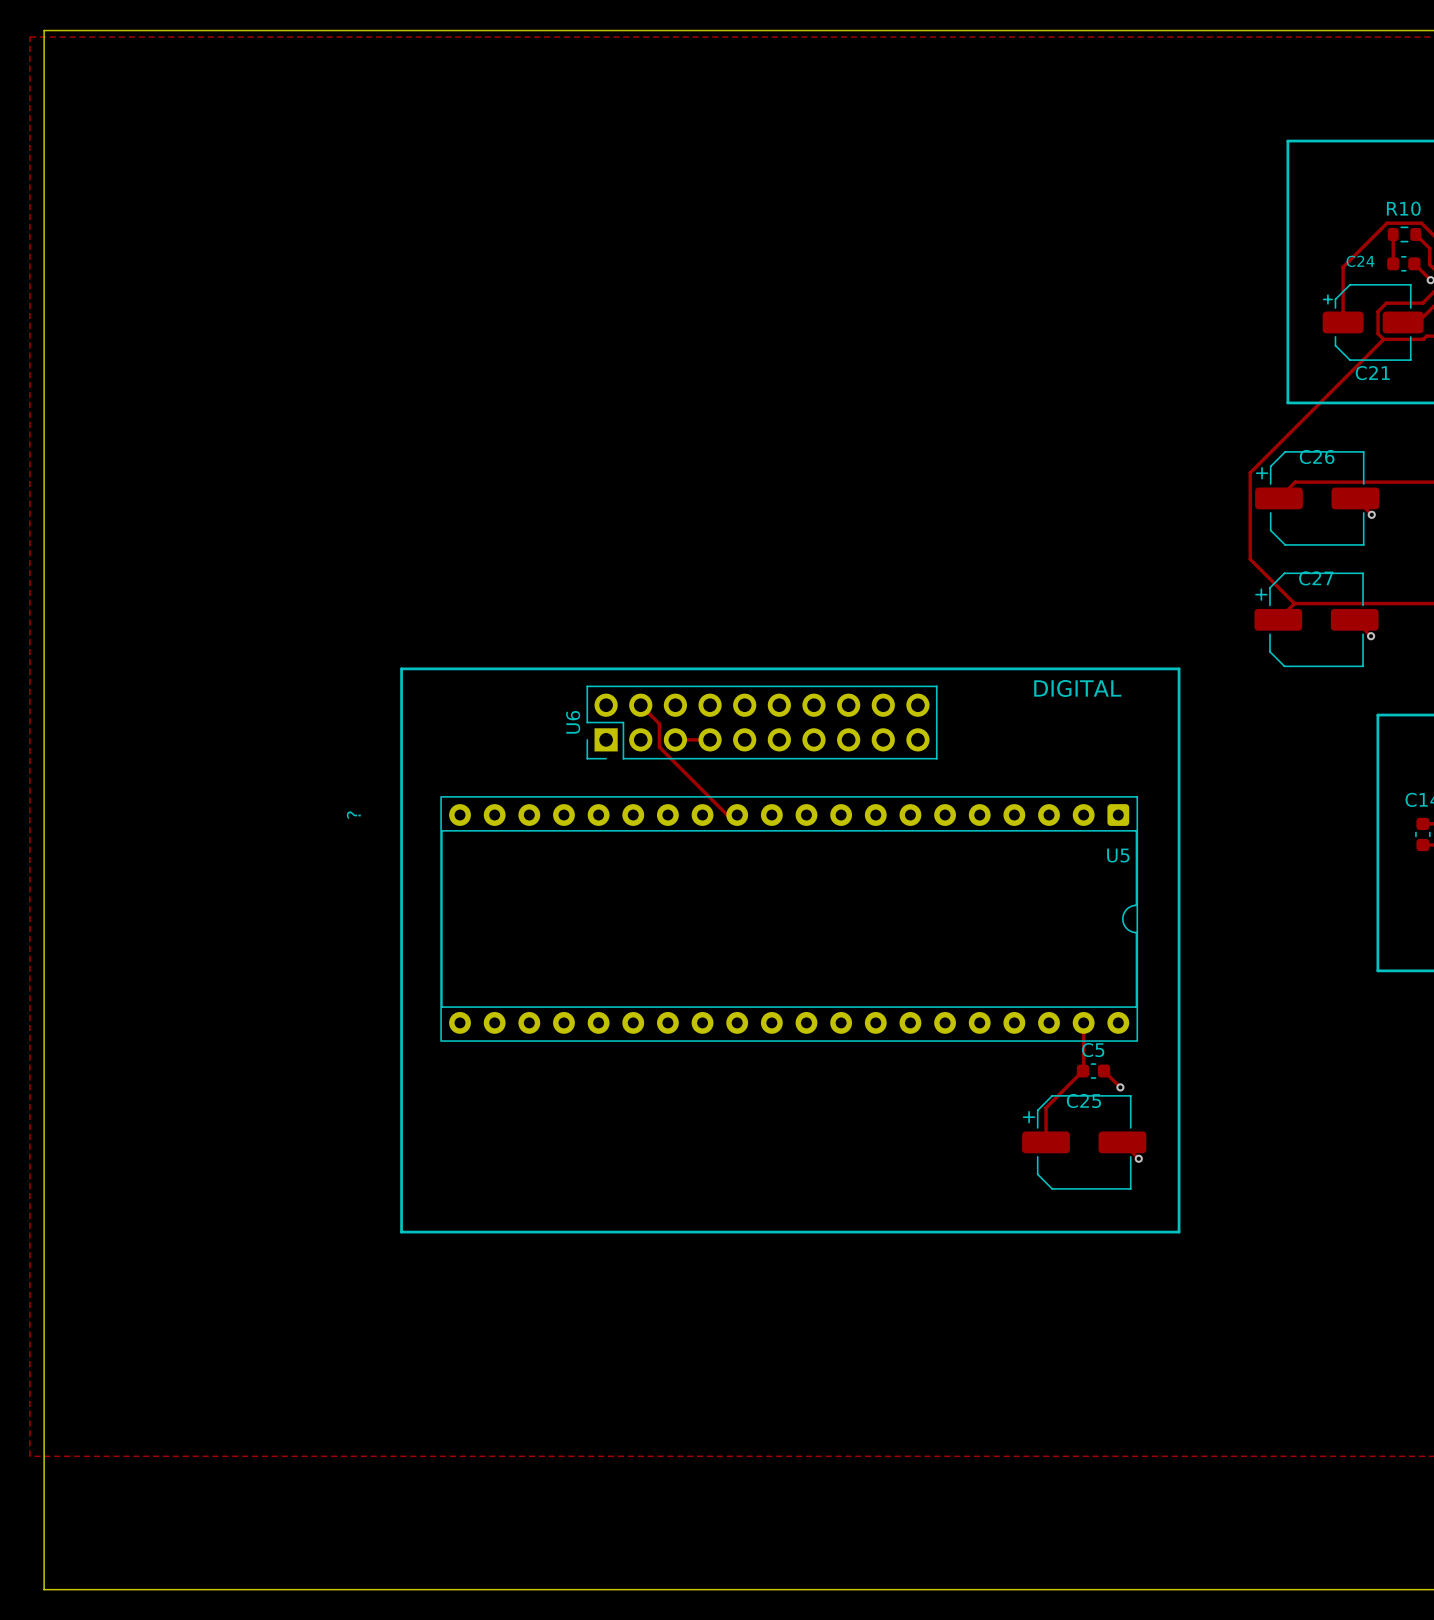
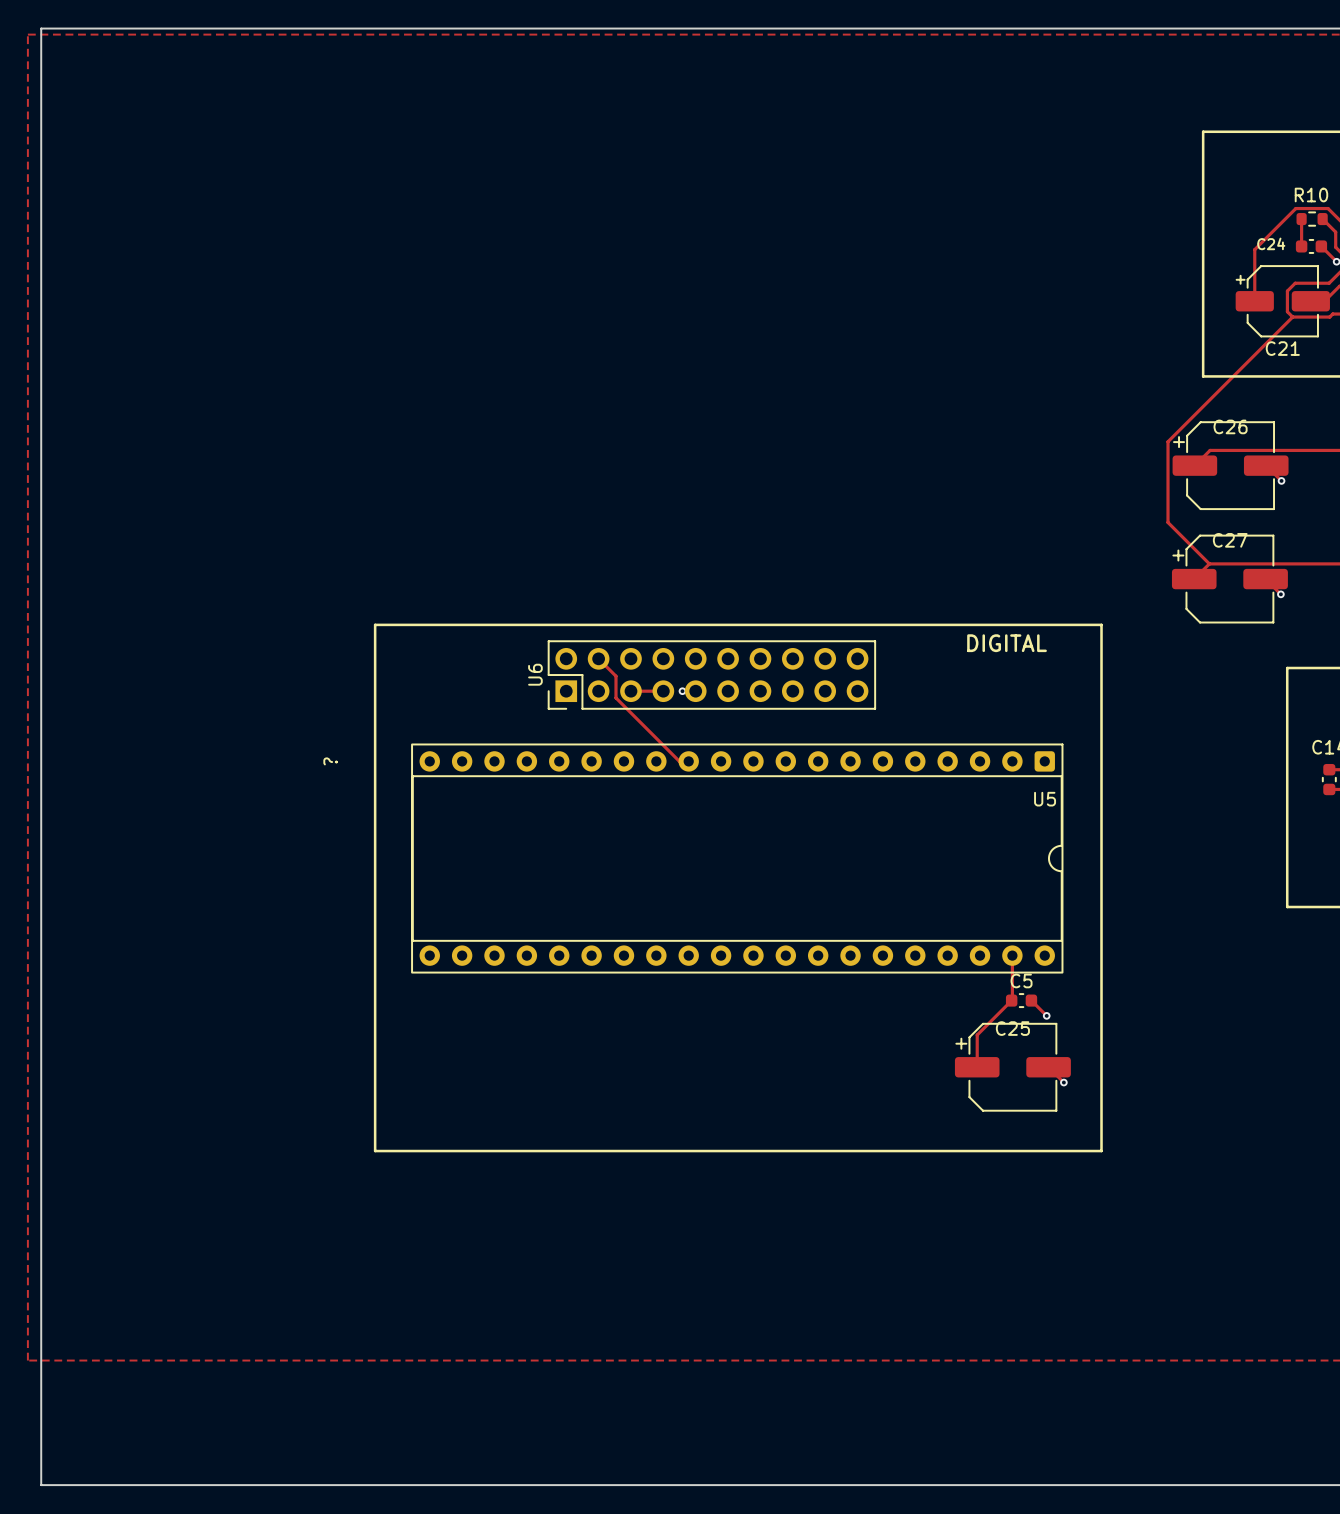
via: none -> (682, 691)

